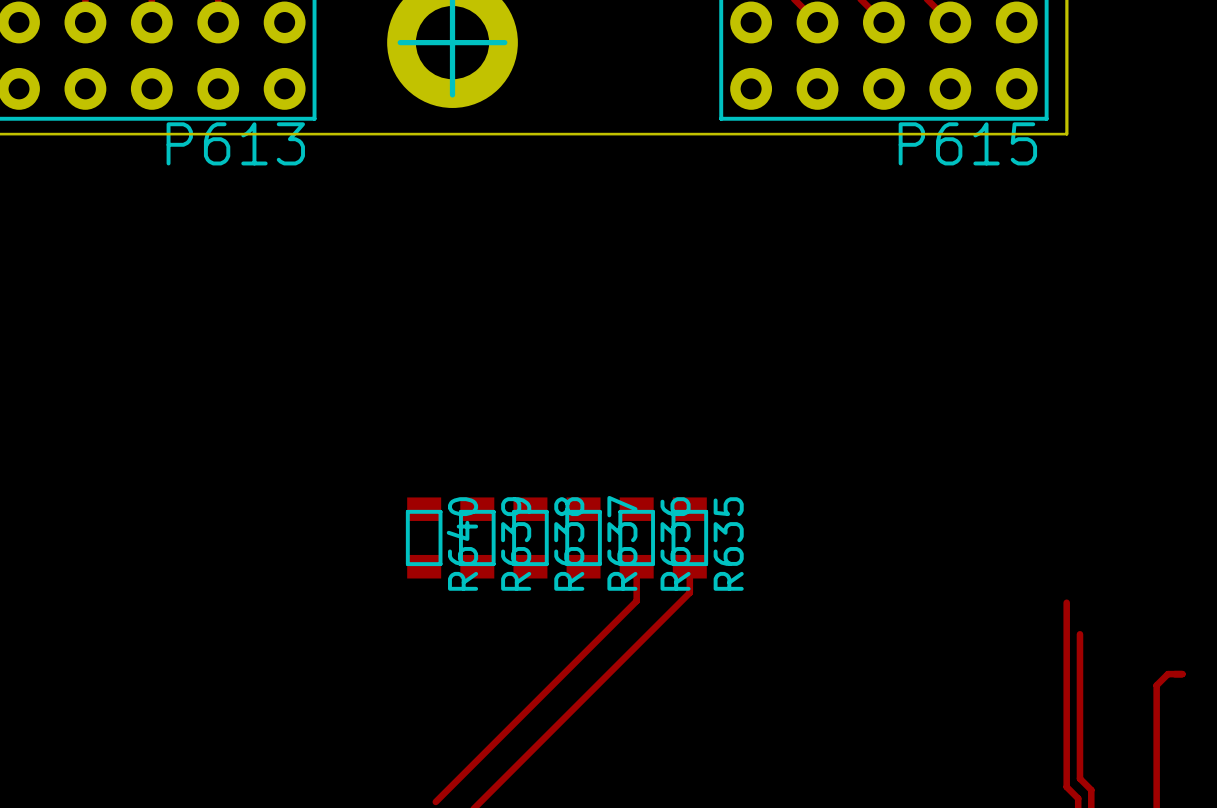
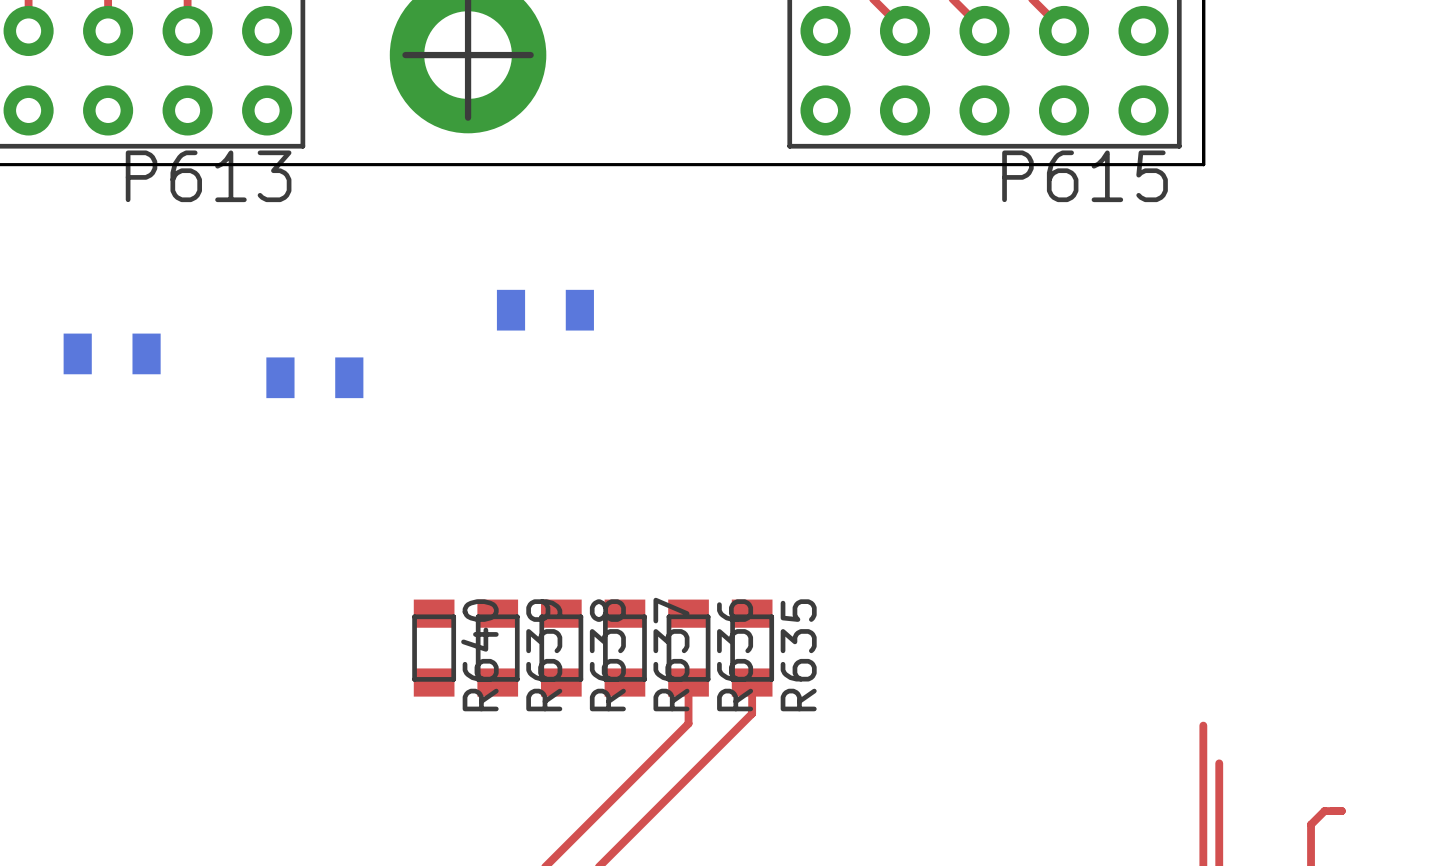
part: none -> (545, 310)
part: none -> (112, 353)
part: none -> (314, 377)

